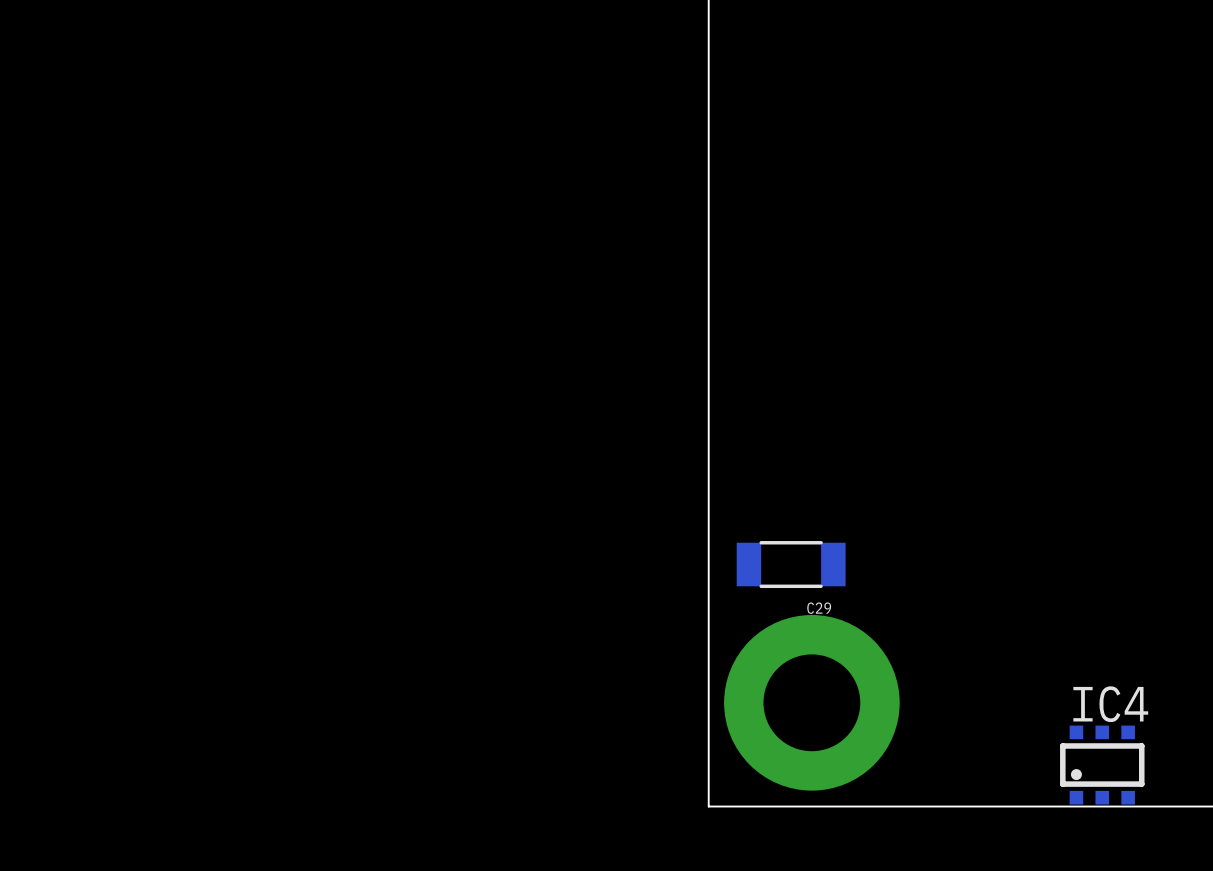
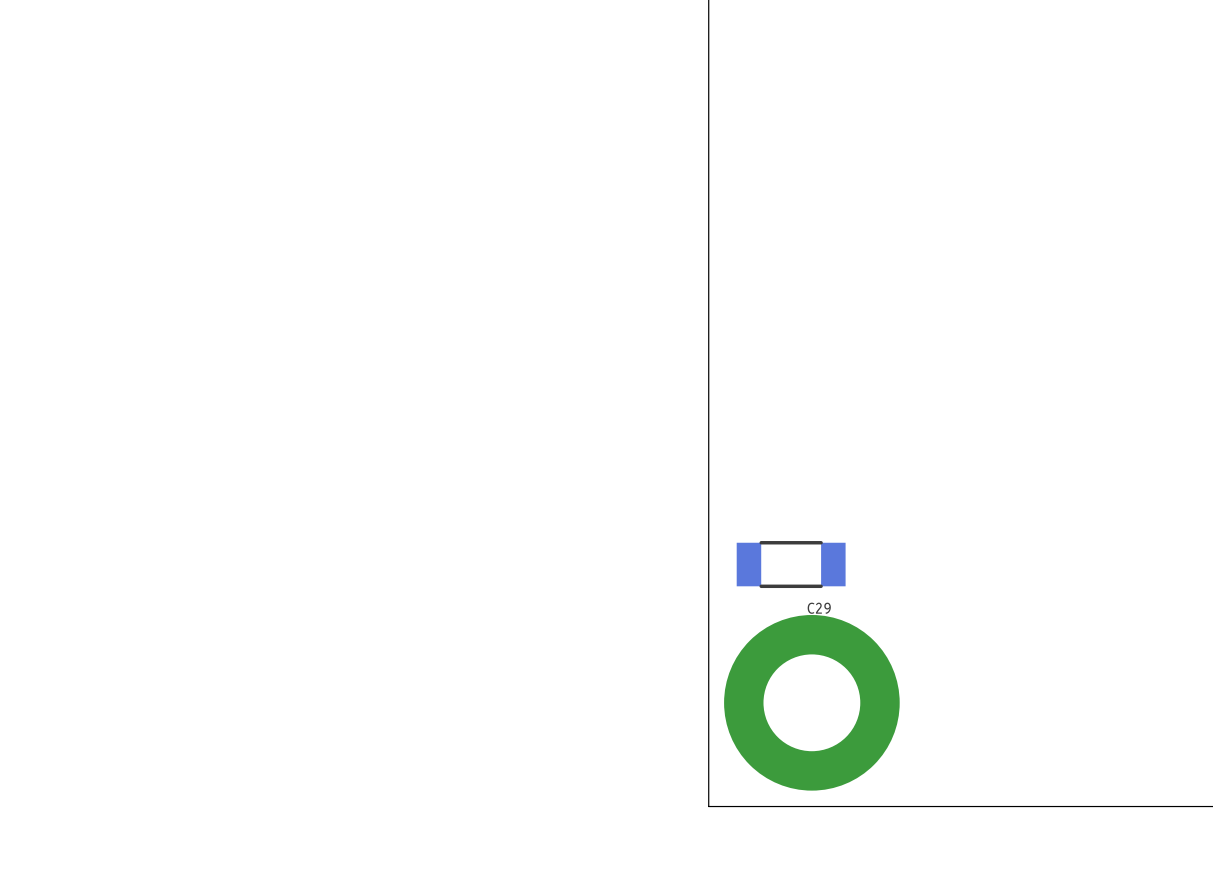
IC4: (1102, 765) -> none

